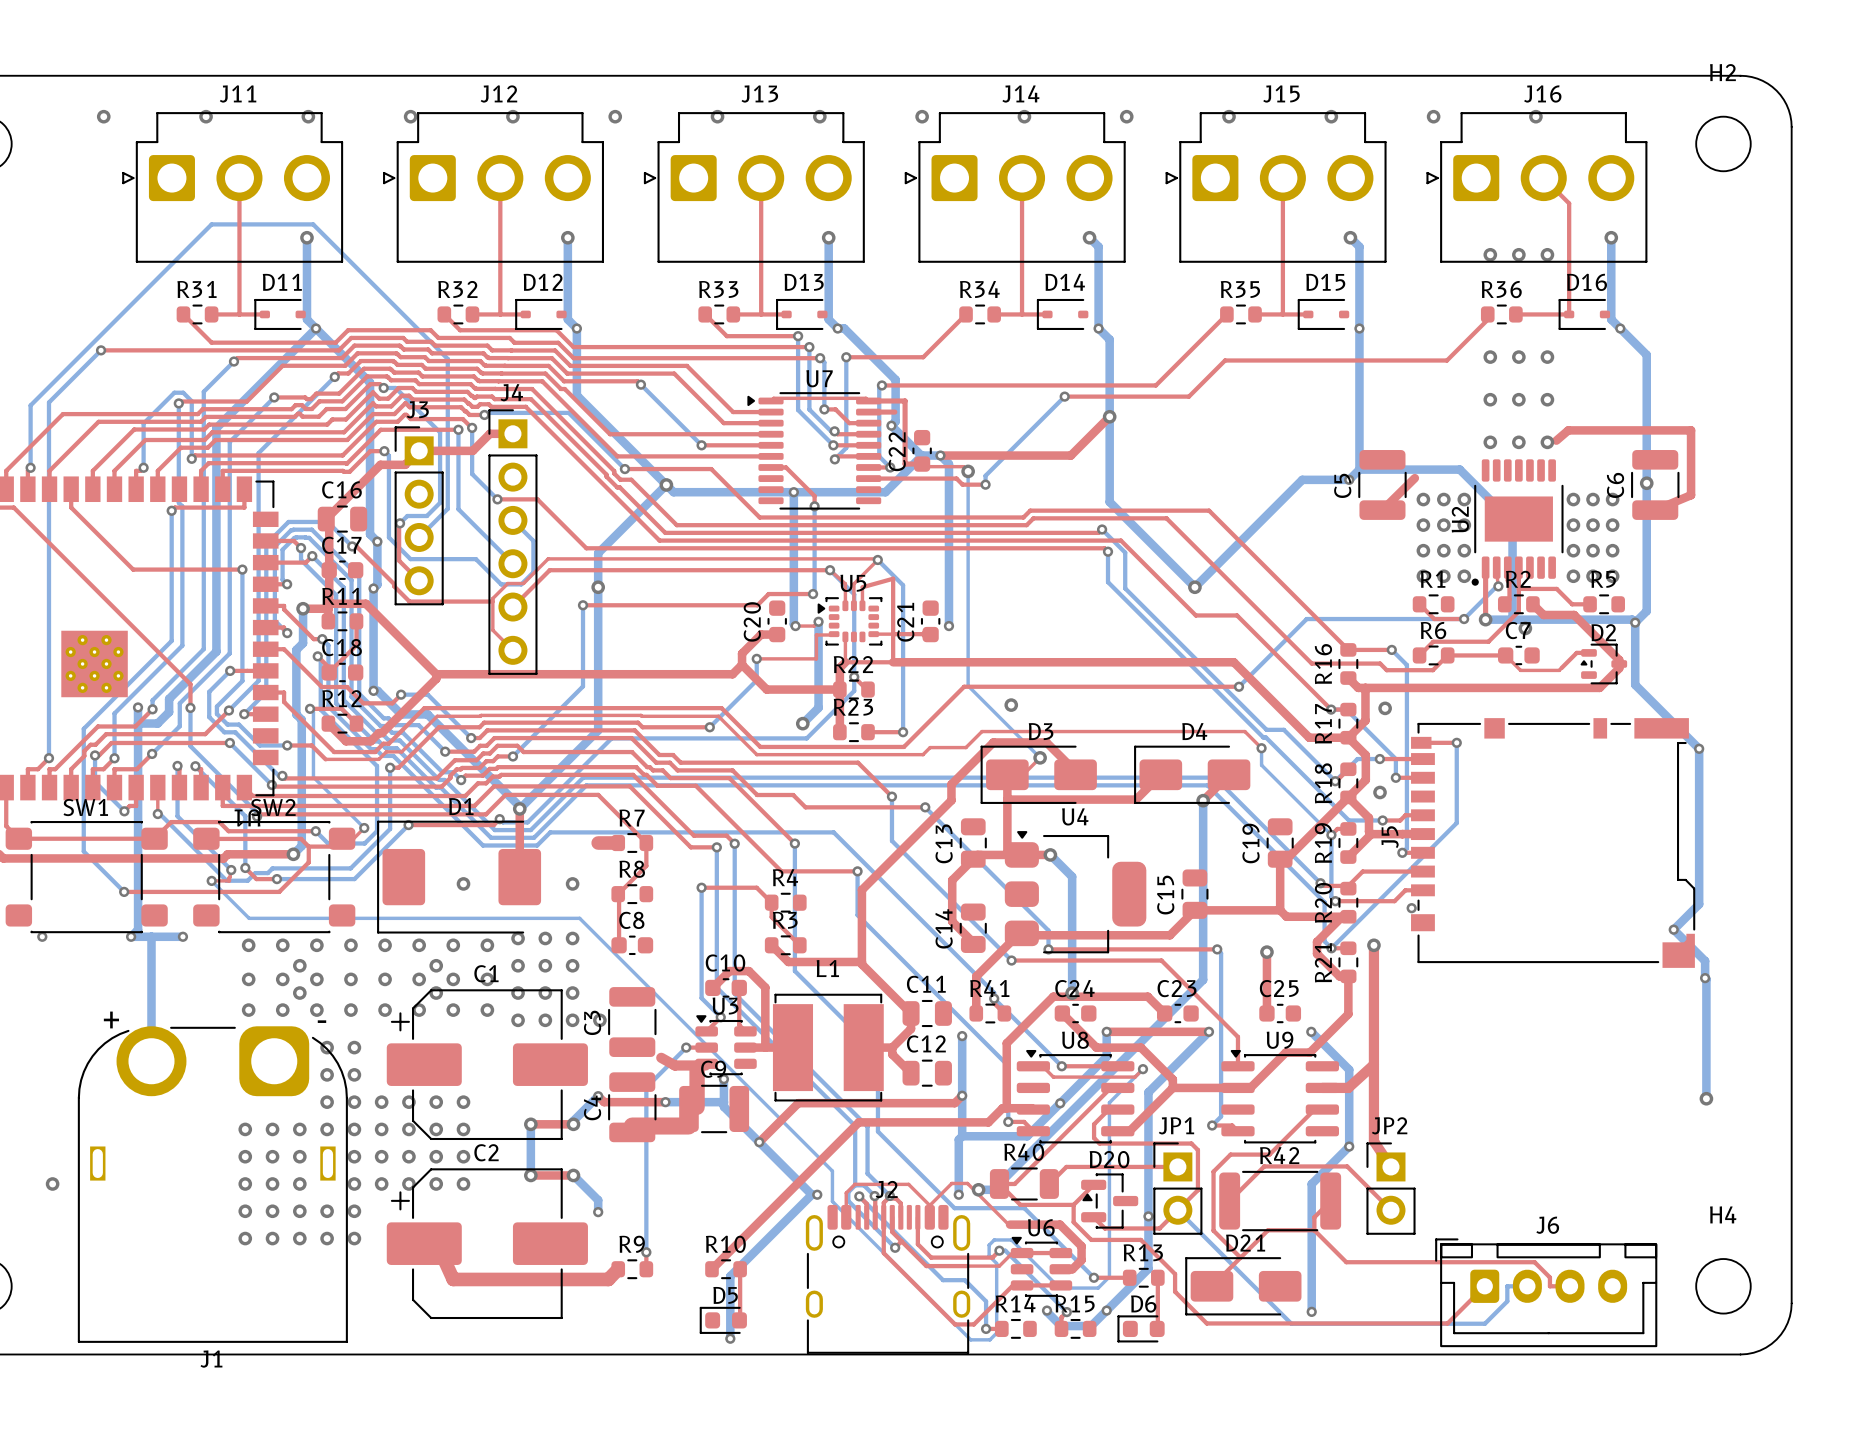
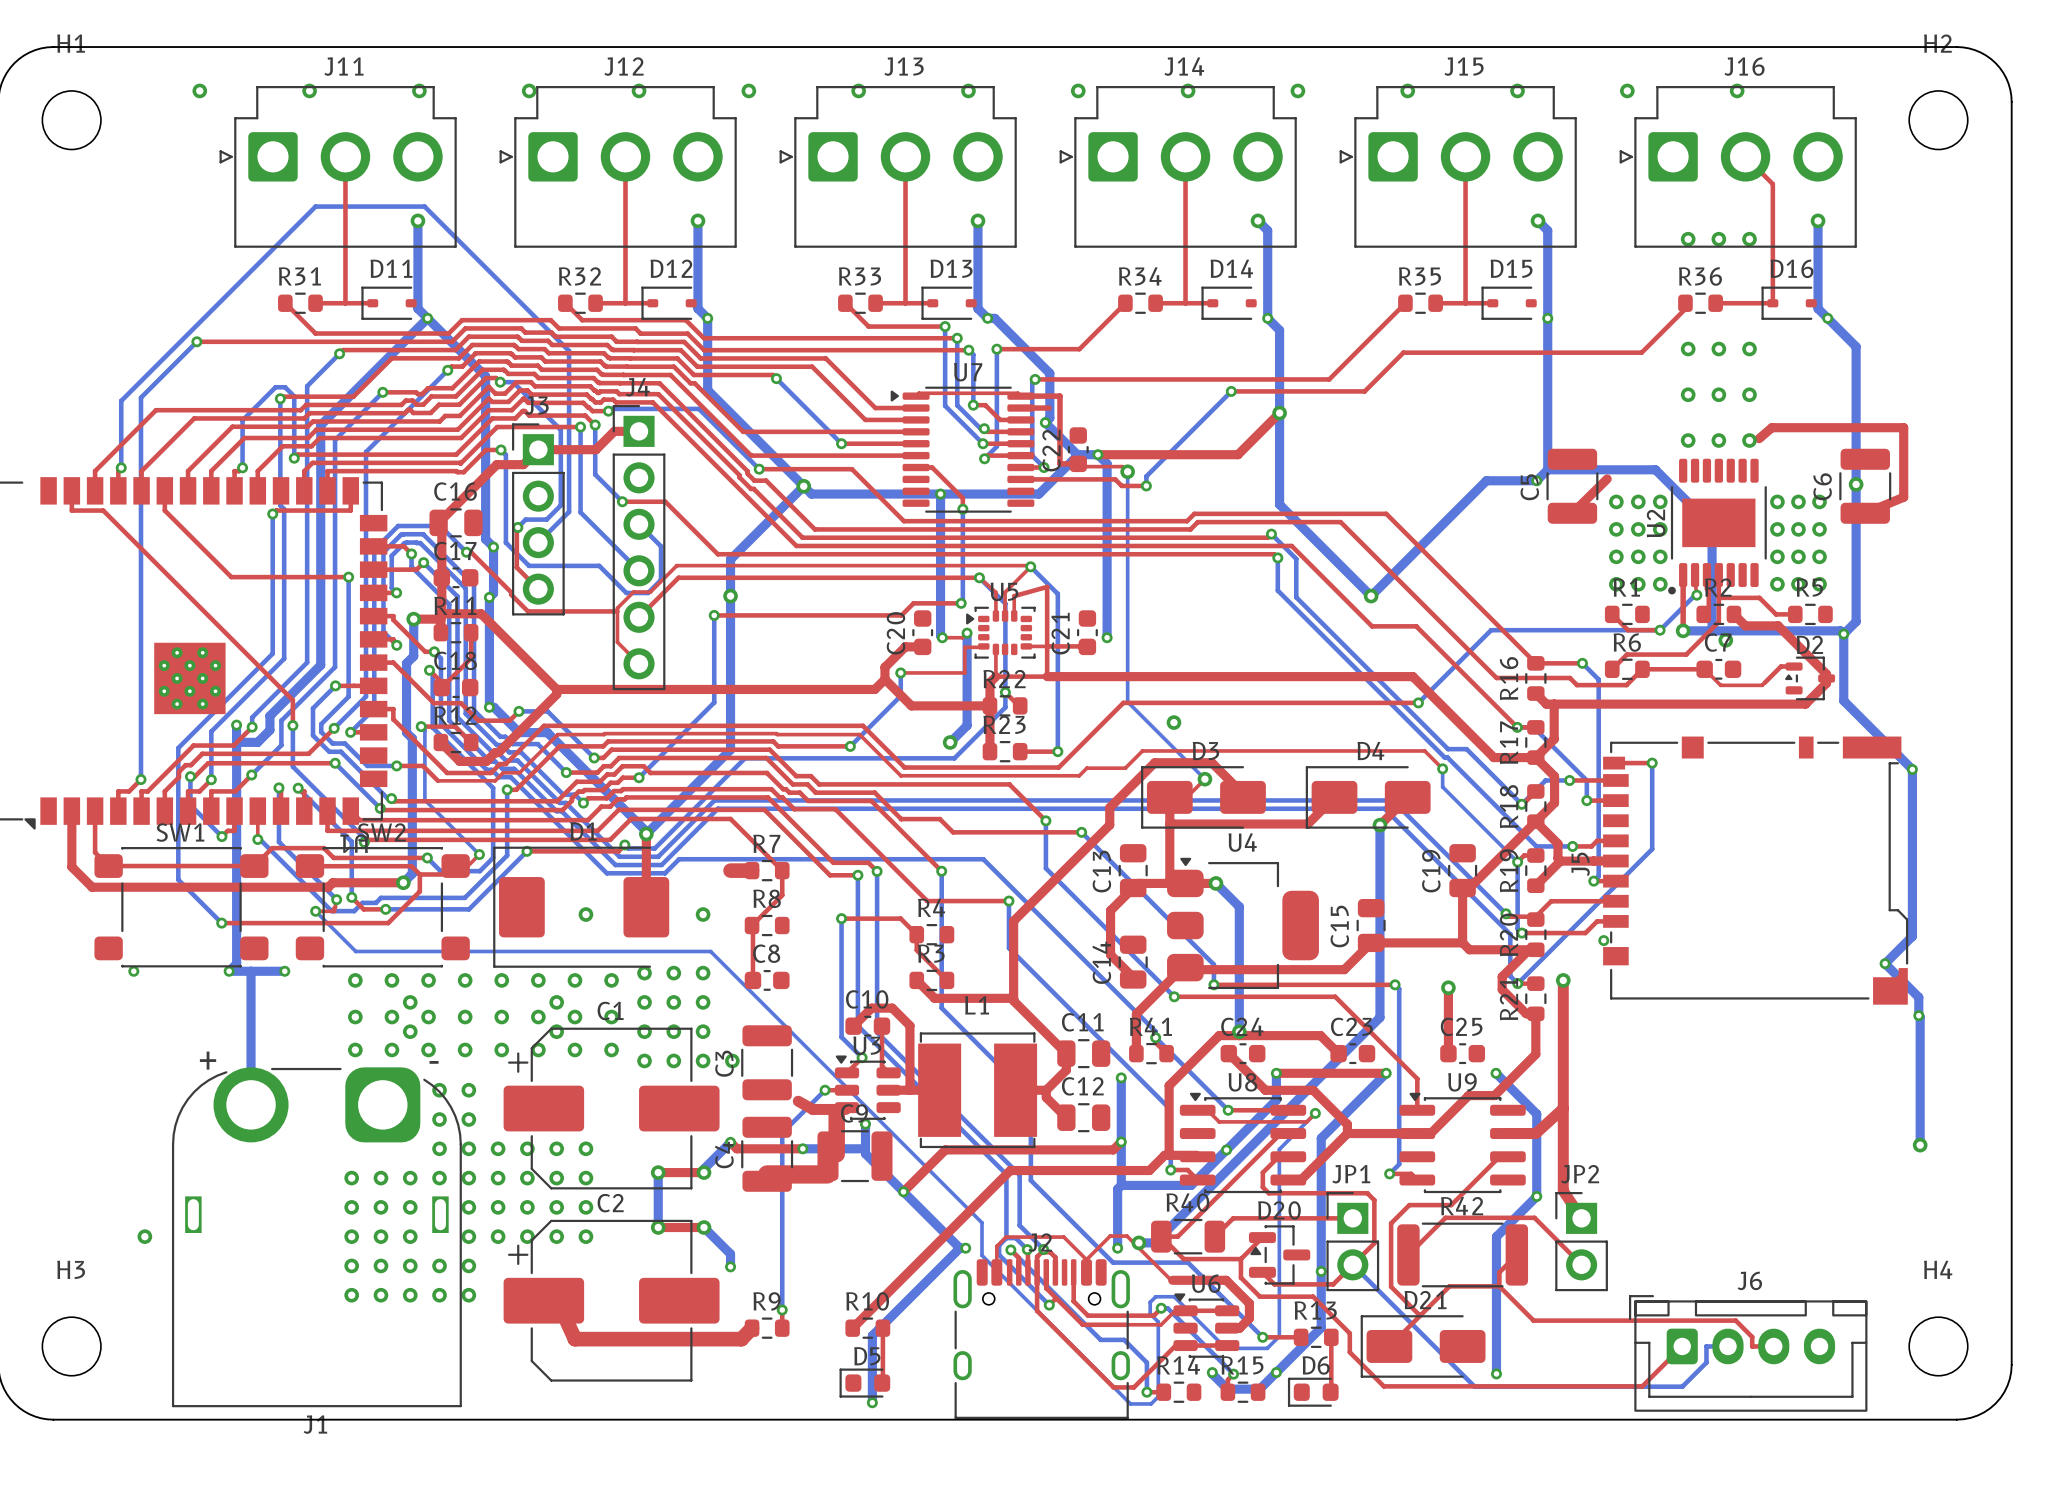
via: (1385, 708) -> none
via: (1380, 792) -> none

